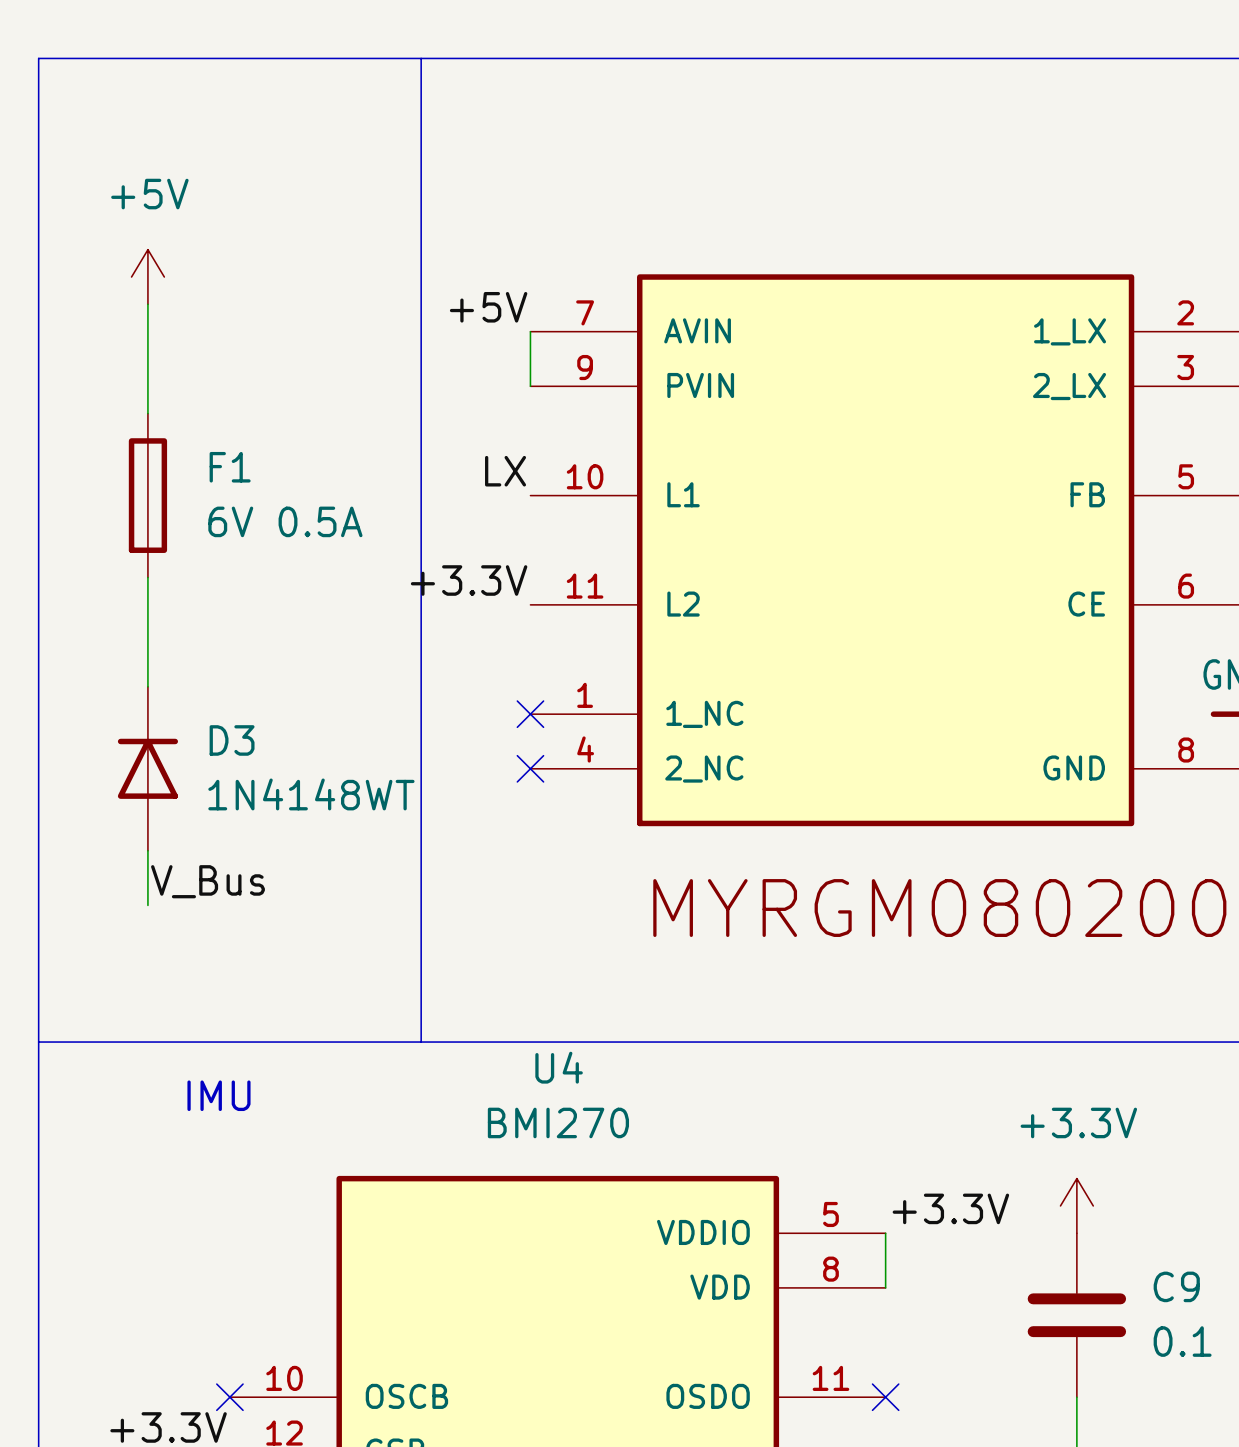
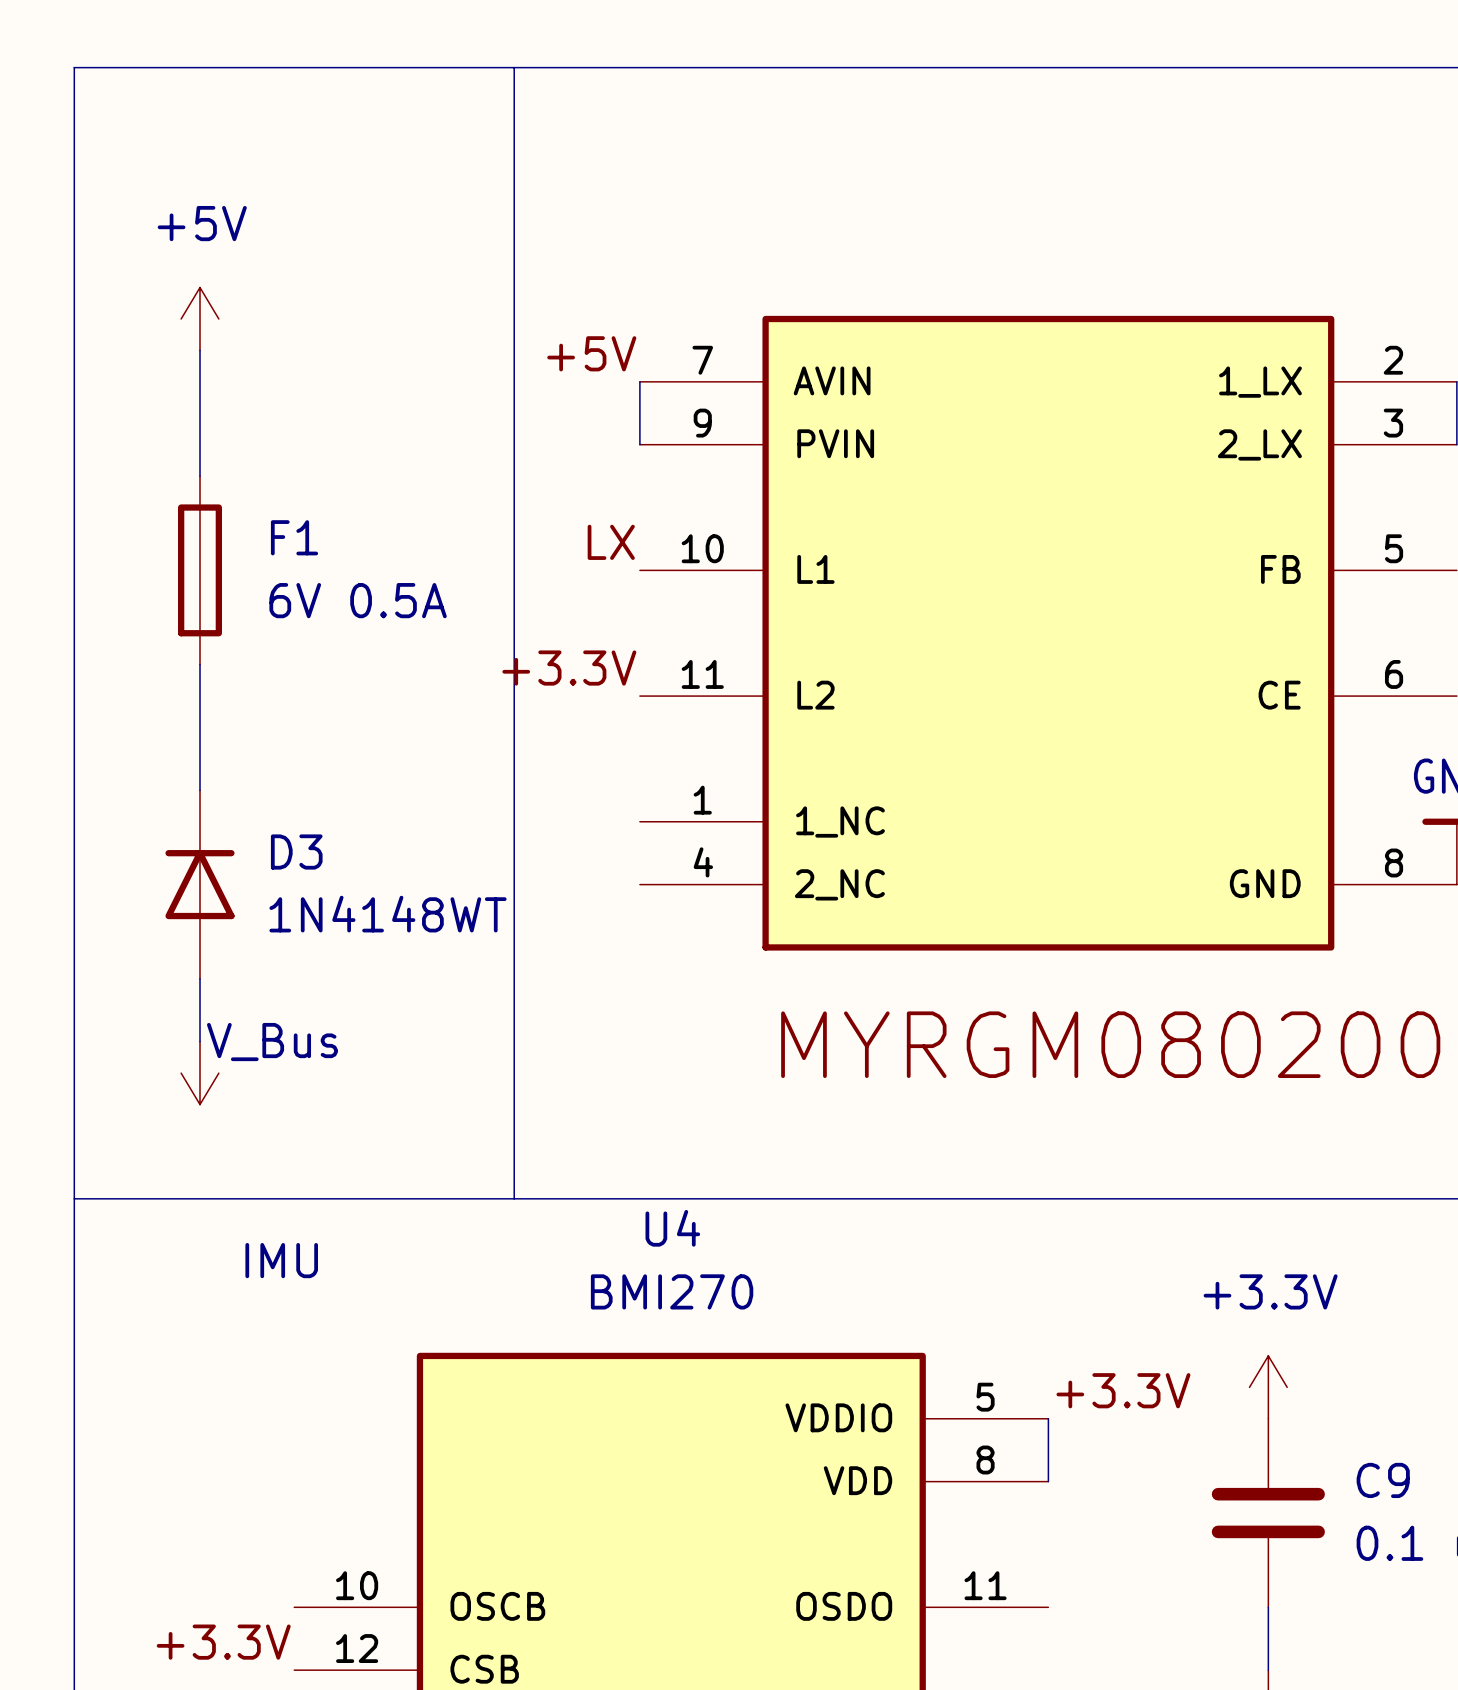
no-connect mark: (530, 714) -> none
no-connect mark: (530, 768) -> none
label: V_Bus (208, 881) -> none
power symbol: none -> V_Bus (199, 1073)
no-connect mark: (229, 1397) -> none
no-connect mark: (885, 1397) -> none

